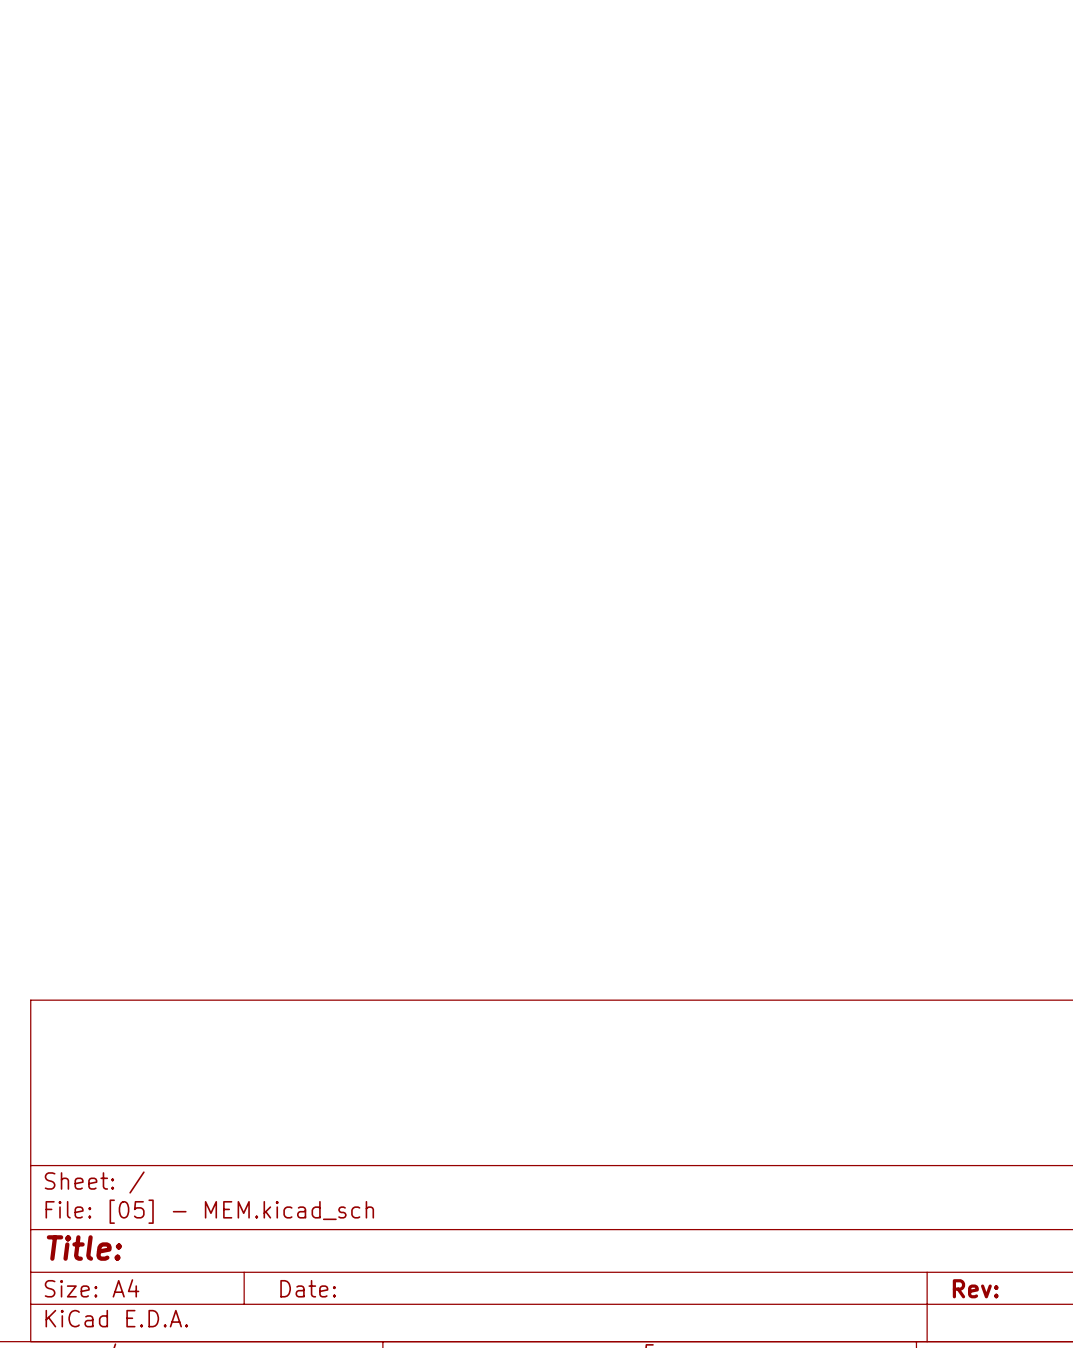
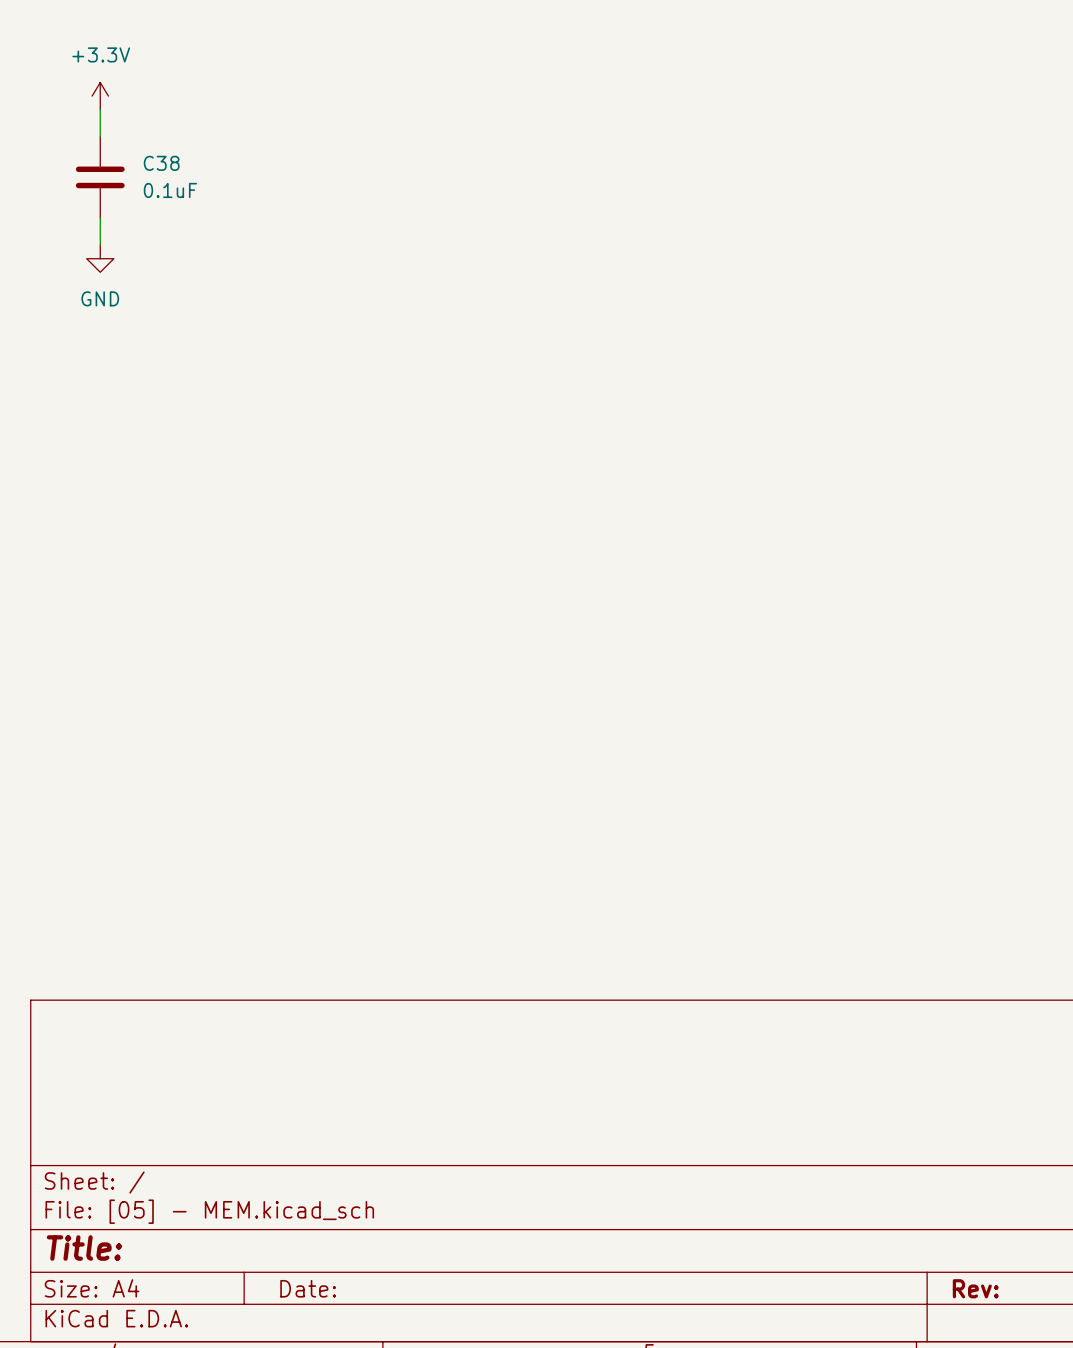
power symbol: none -> +3.3V (100, 96)
wire: none -> (100, 109) (100, 136)
C38: none -> 0.1uF (100, 177)
wire: none -> (100, 218) (100, 245)
power symbol: none -> GND (100, 258)

